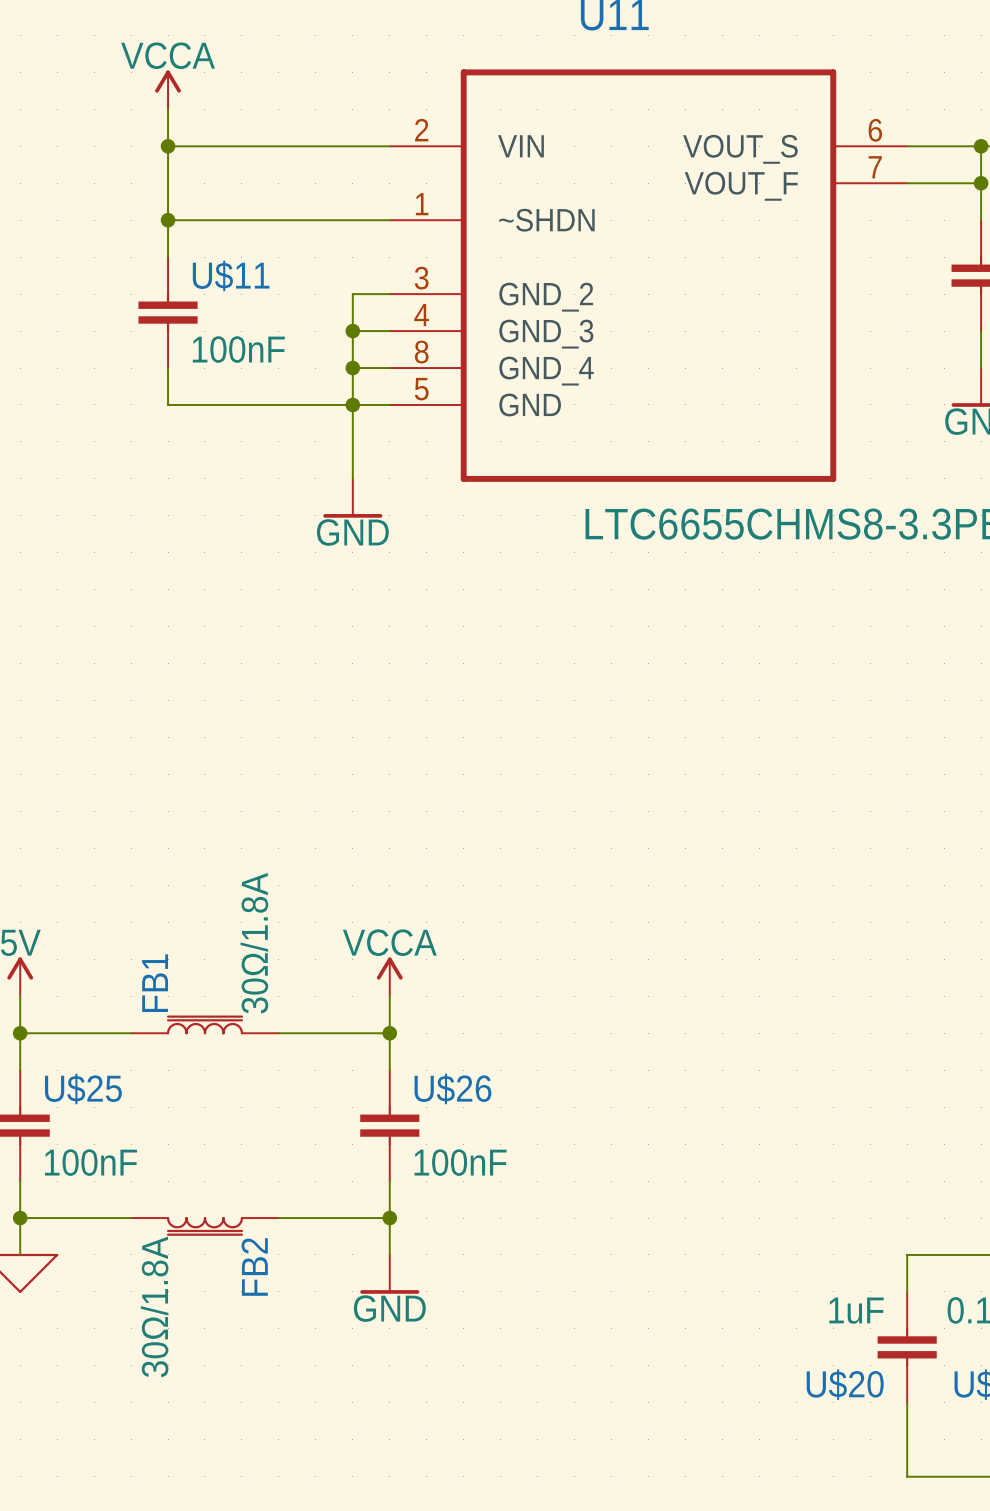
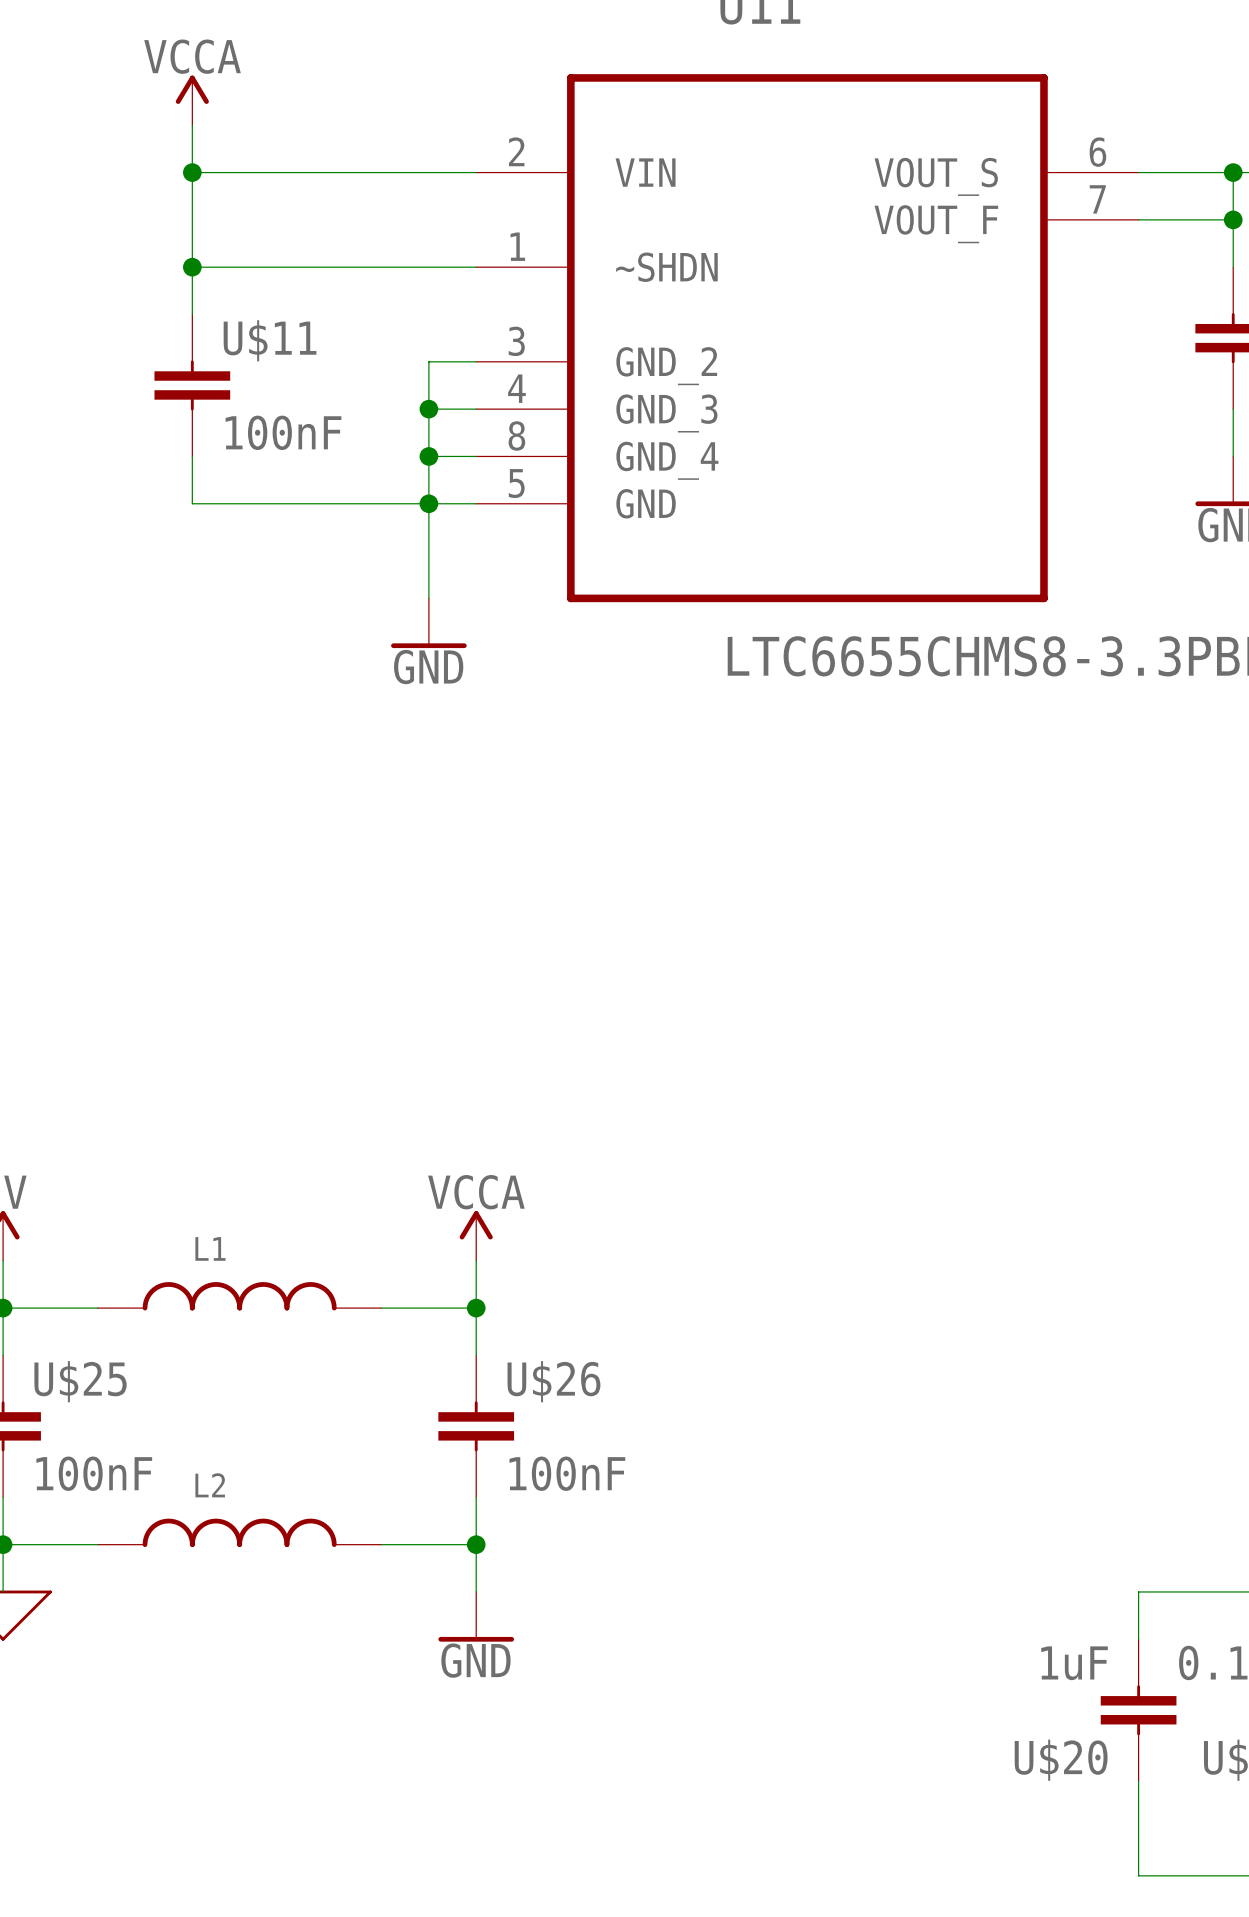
FB1: 30Ω/1.8A (204, 1024) -> none
L1: none -> (239, 1296)
L2: none -> (239, 1532)
FB2: 30Ω/1.8A (204, 1226) -> none

